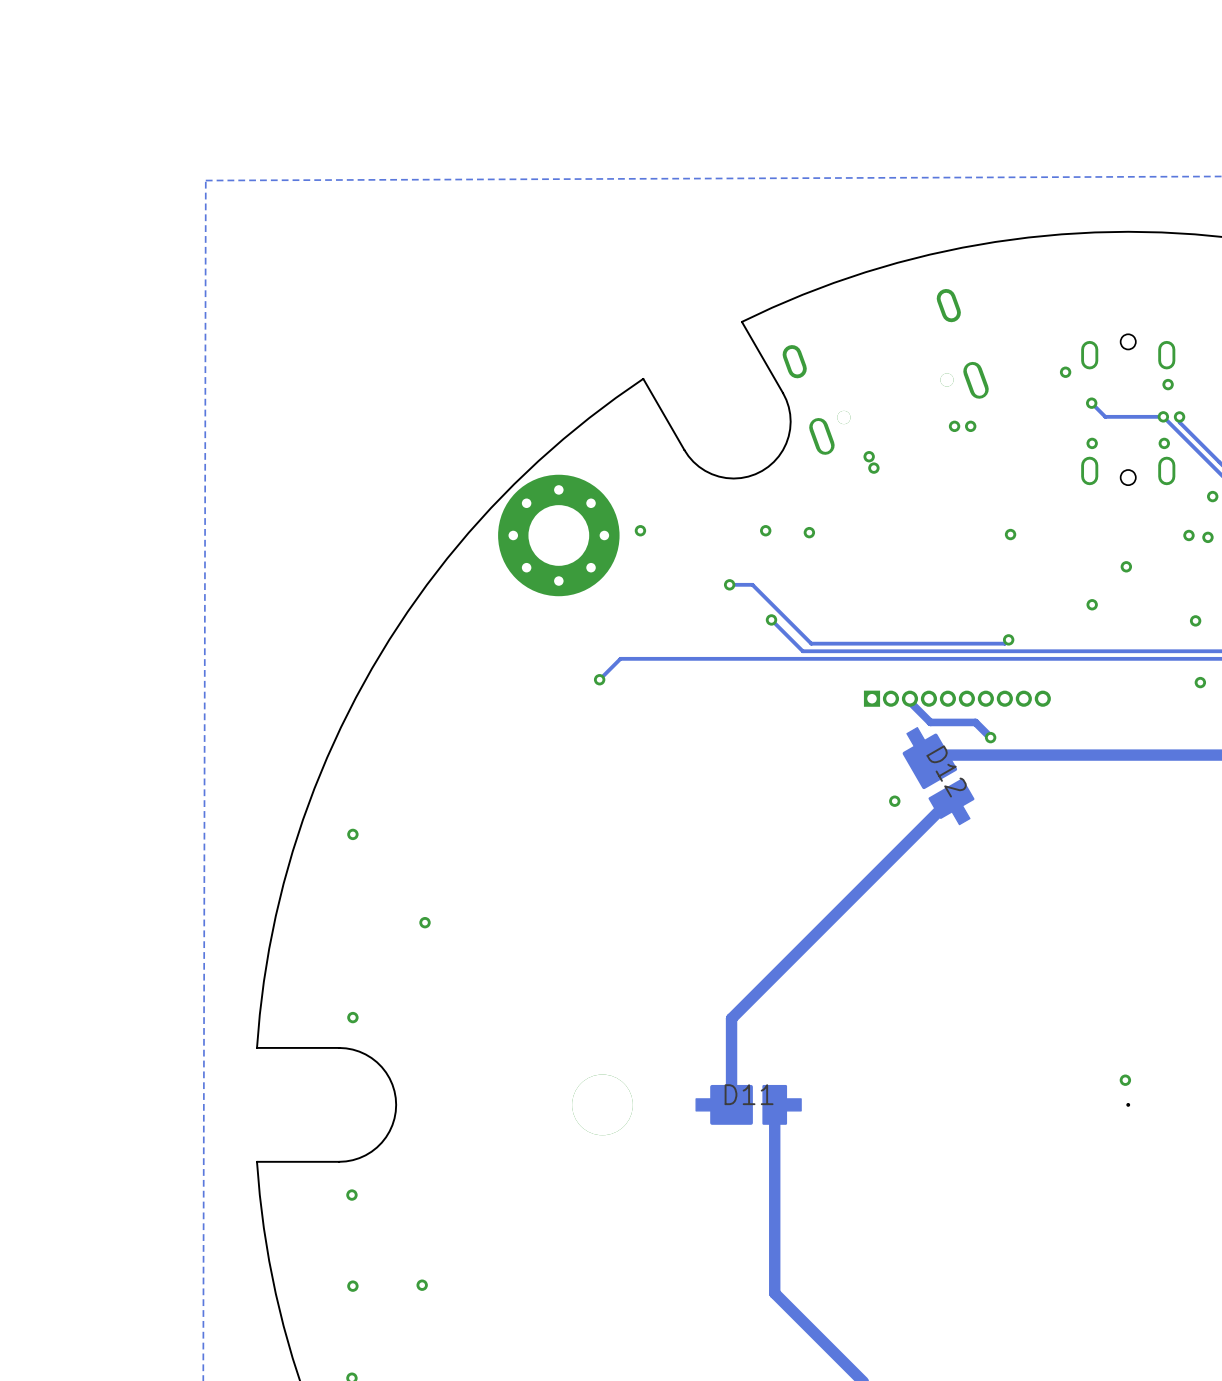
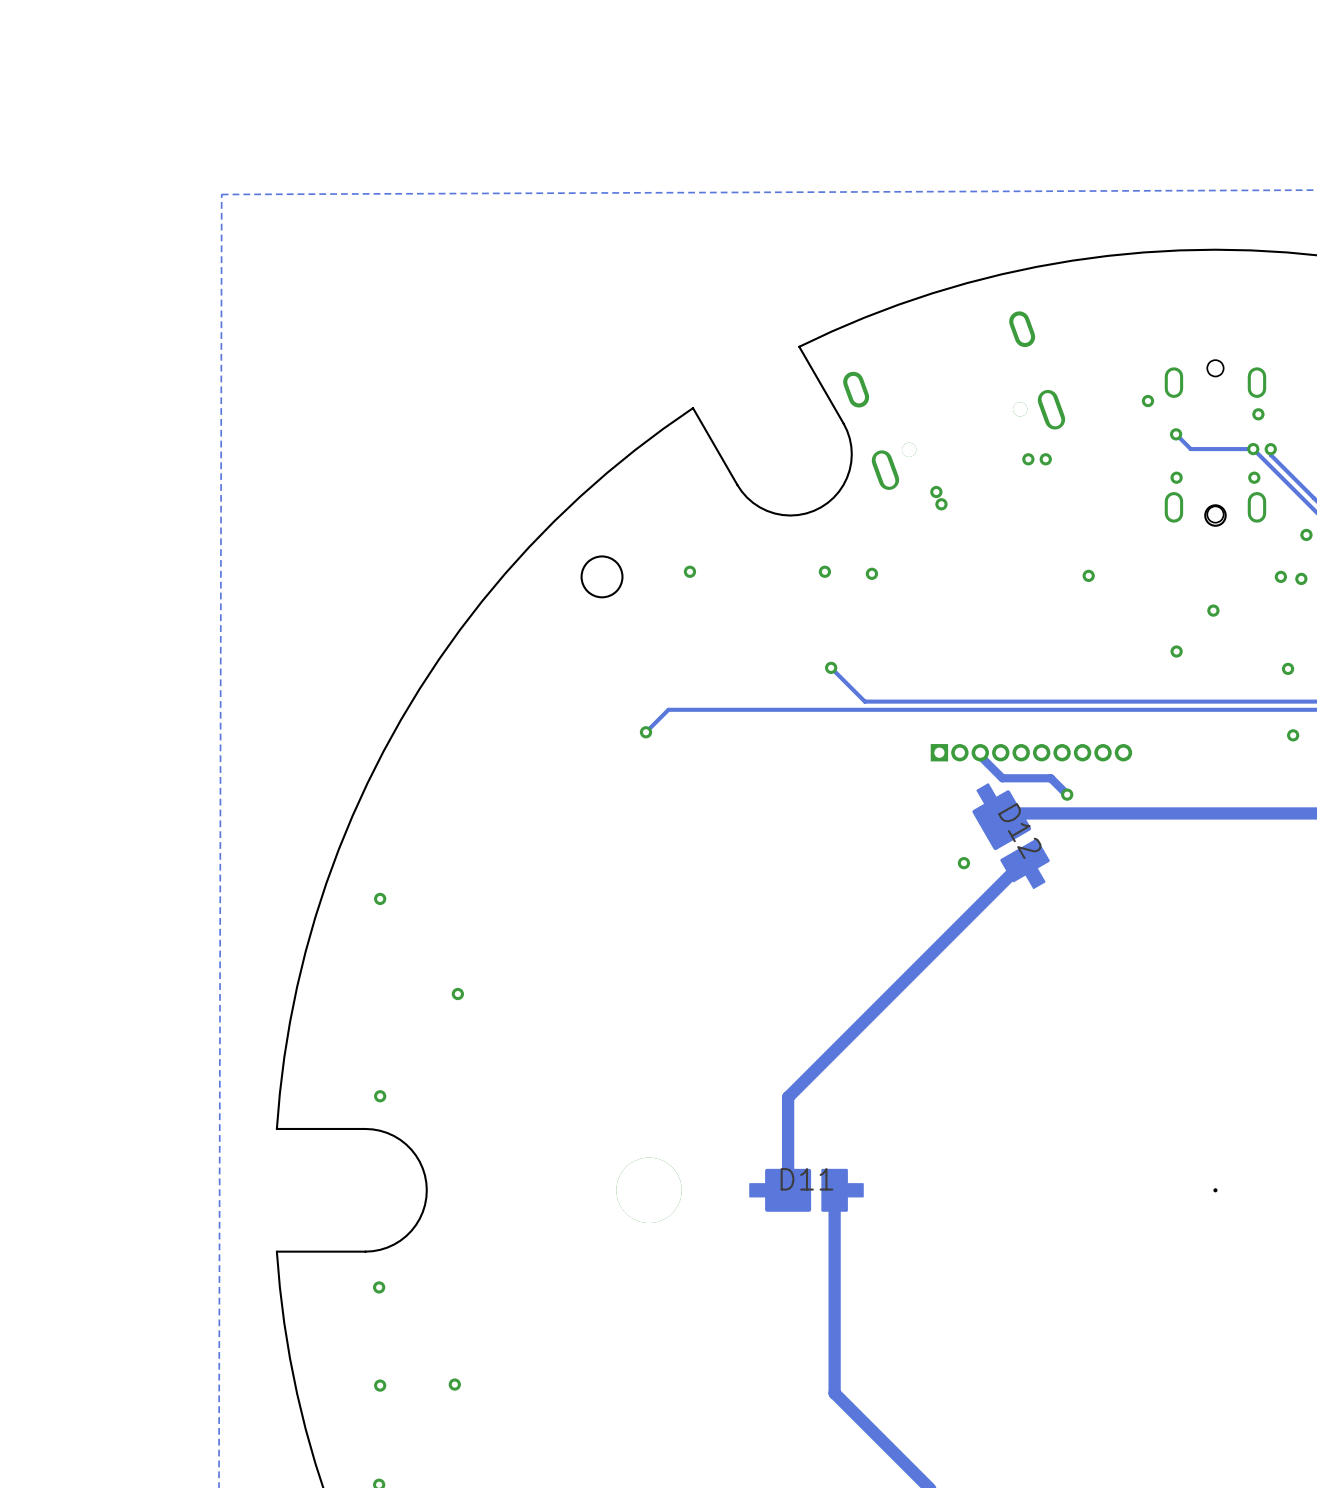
round board edge: none -> [1204, 504, 1227, 527]
round board edge: none -> [580, 555, 624, 599]
part: (558, 535) -> none
track: (729, 584) (752, 584) (811, 643) (1004, 643) (1008, 639) -> none
via: (729, 584) -> none
via: (1008, 639) -> none
via: (1125, 1080) -> none

